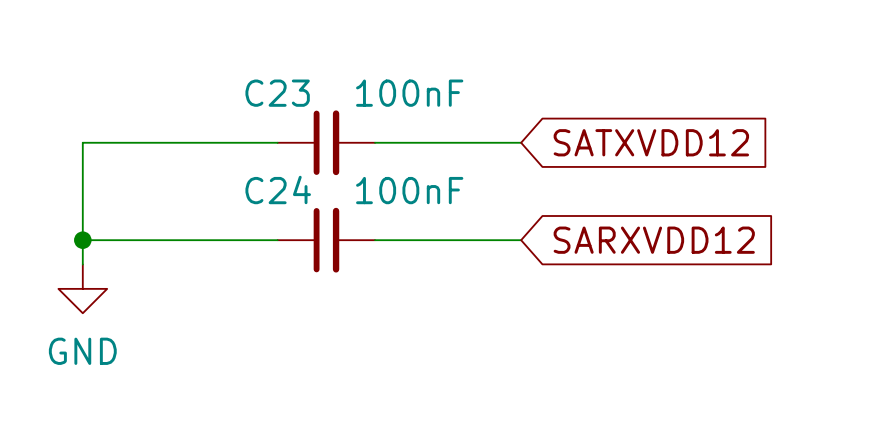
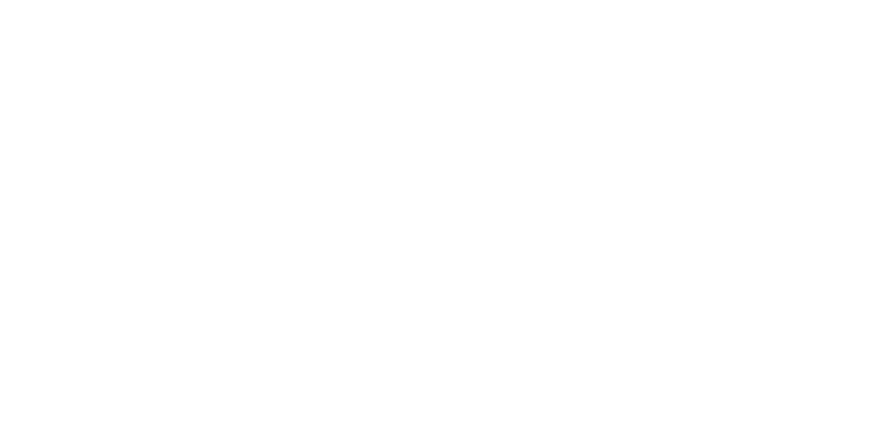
wire: (277, 142) (82, 142) (82, 264) -> none
C23: 100nF (326, 142) -> none
wire: (375, 142) (521, 142) -> none
global label: SATXVDD12 (651, 142) -> none
wire: (82, 240) (277, 240) -> none
junction: (82, 240) -> none
C24: 100nF (326, 240) -> none
wire: (375, 240) (521, 240) -> none
global label: SARXVDD12 (654, 240) -> none
power symbol: GND (82, 288) -> none

